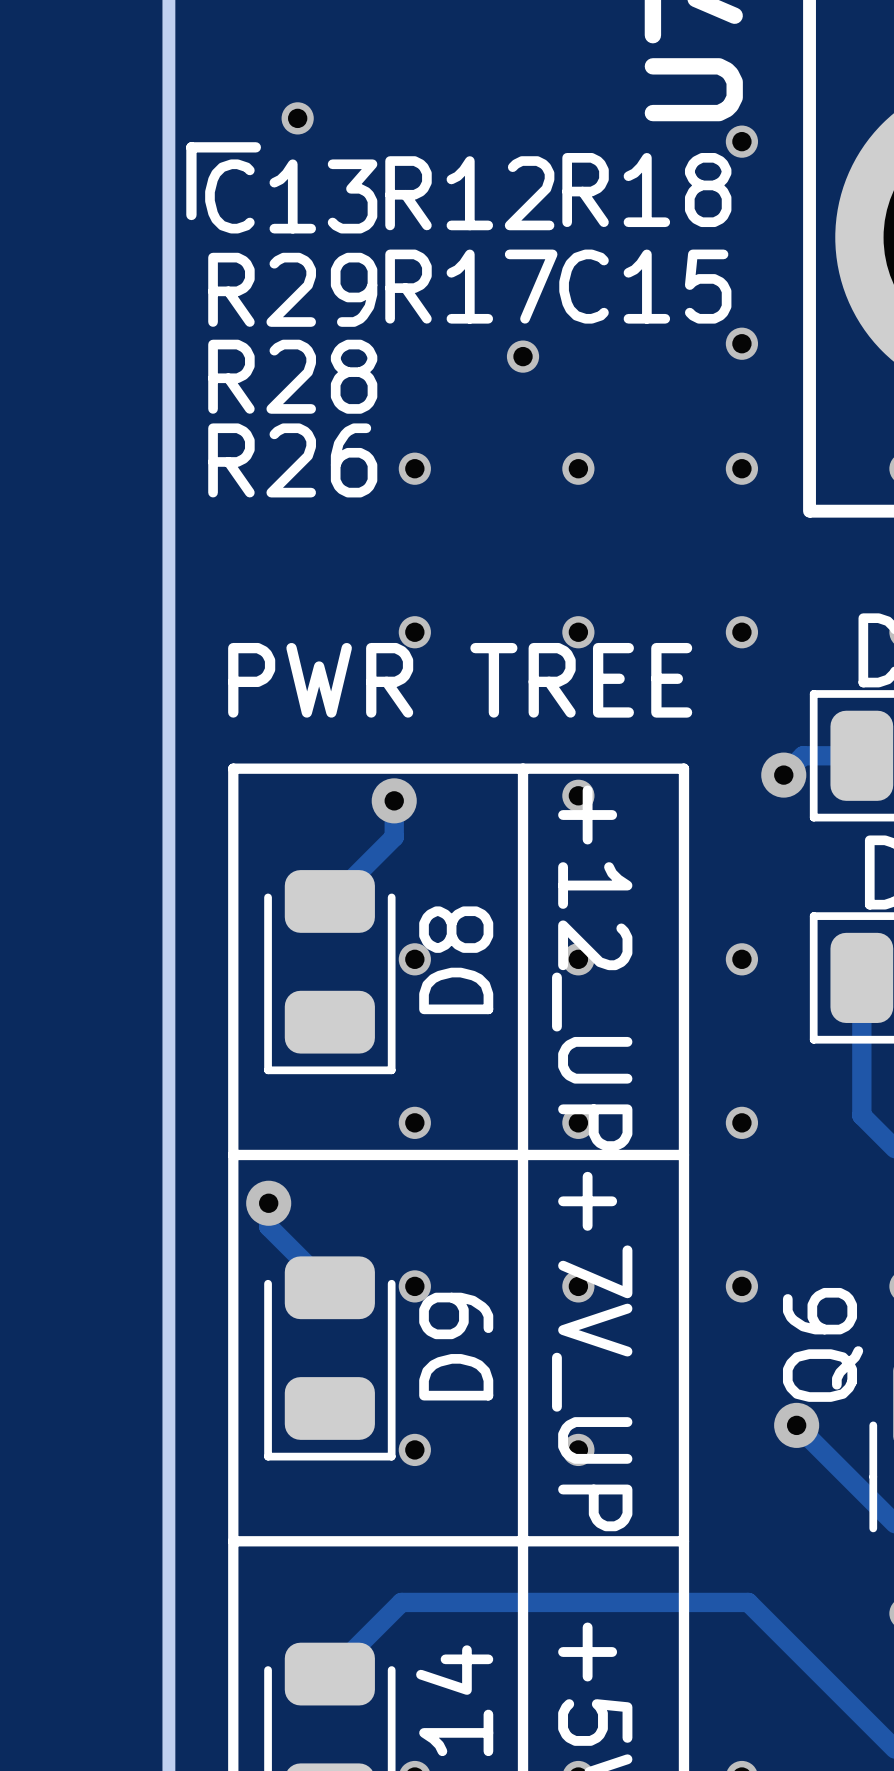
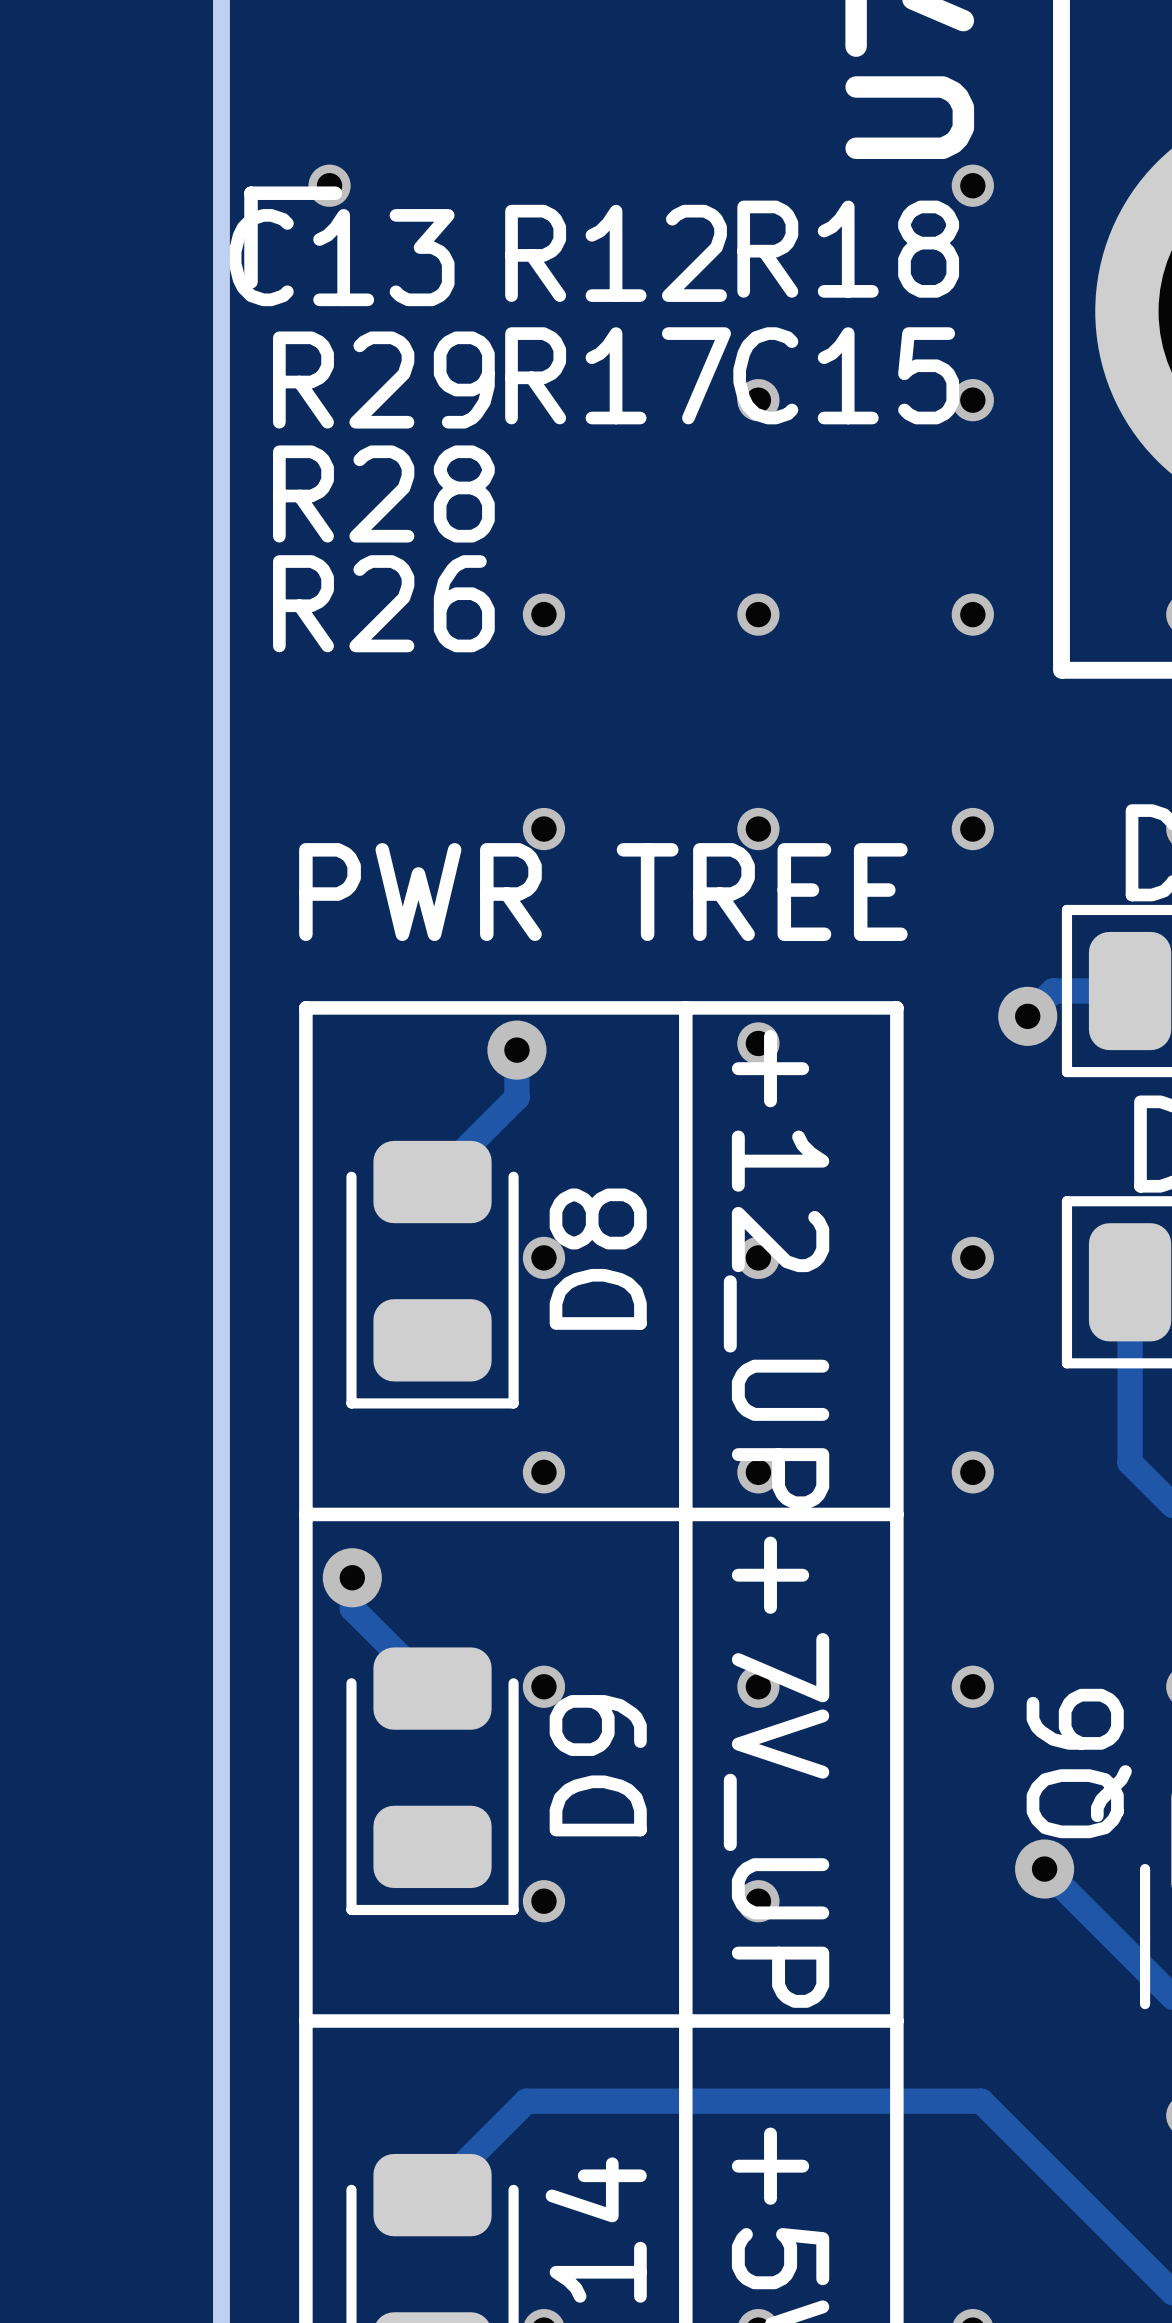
via position: (297, 118) -> (329, 185)
C13 name position: C13 (291, 196) -> C13 (341, 257)
via position: (741, 343) -> (972, 400)
via position: (523, 356) -> (758, 400)

